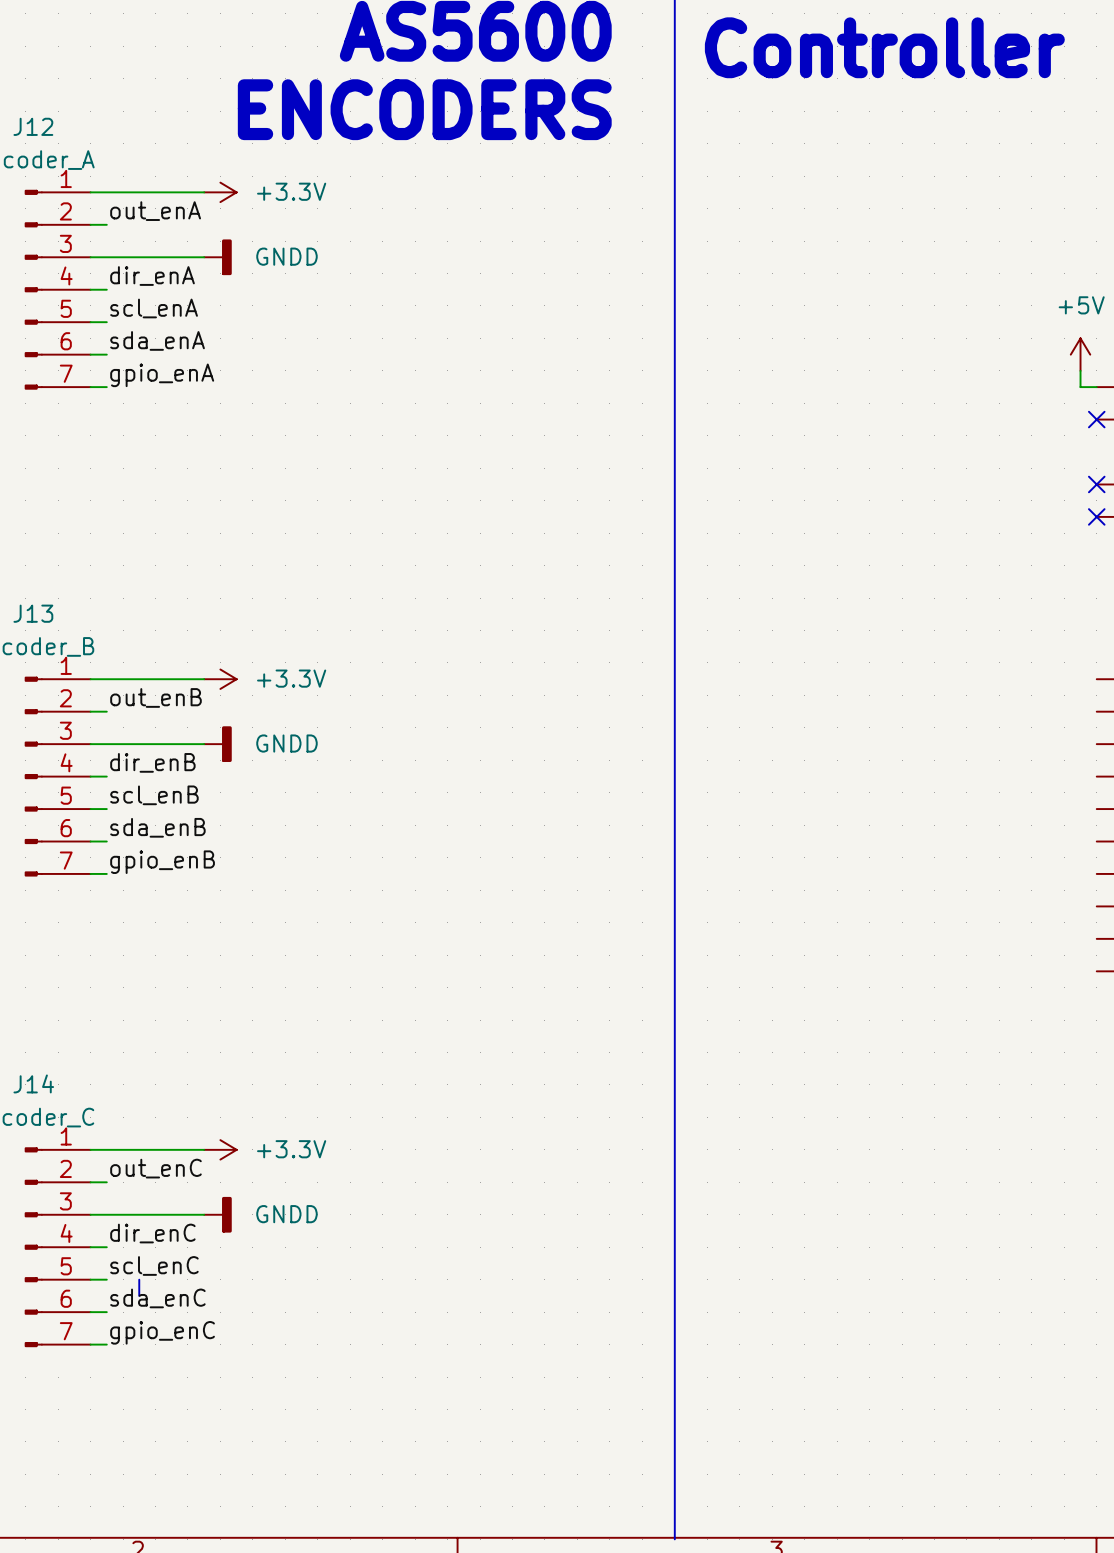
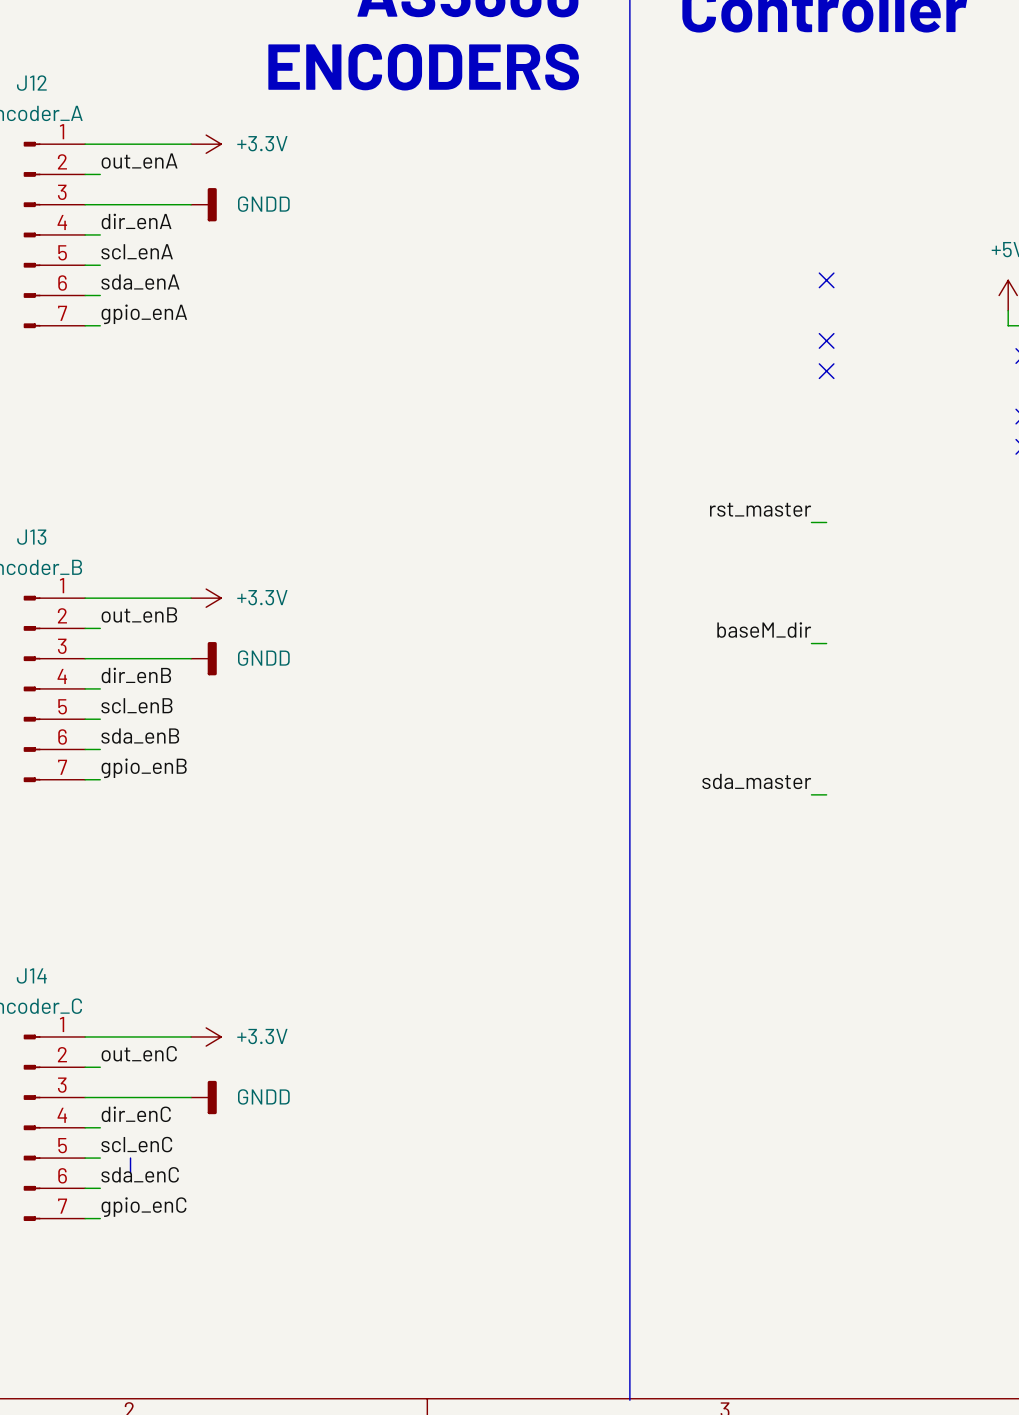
no-connect mark: none -> (826, 280)
no-connect mark: none -> (826, 340)
no-connect mark: none -> (826, 371)
label: none -> rst_master (760, 509)
wire: none -> (811, 522) (826, 522)
label: none -> baseM_dir (764, 630)
wire: none -> (811, 643) (826, 643)
label: none -> sda_master (756, 781)
wire: none -> (811, 794) (826, 794)

